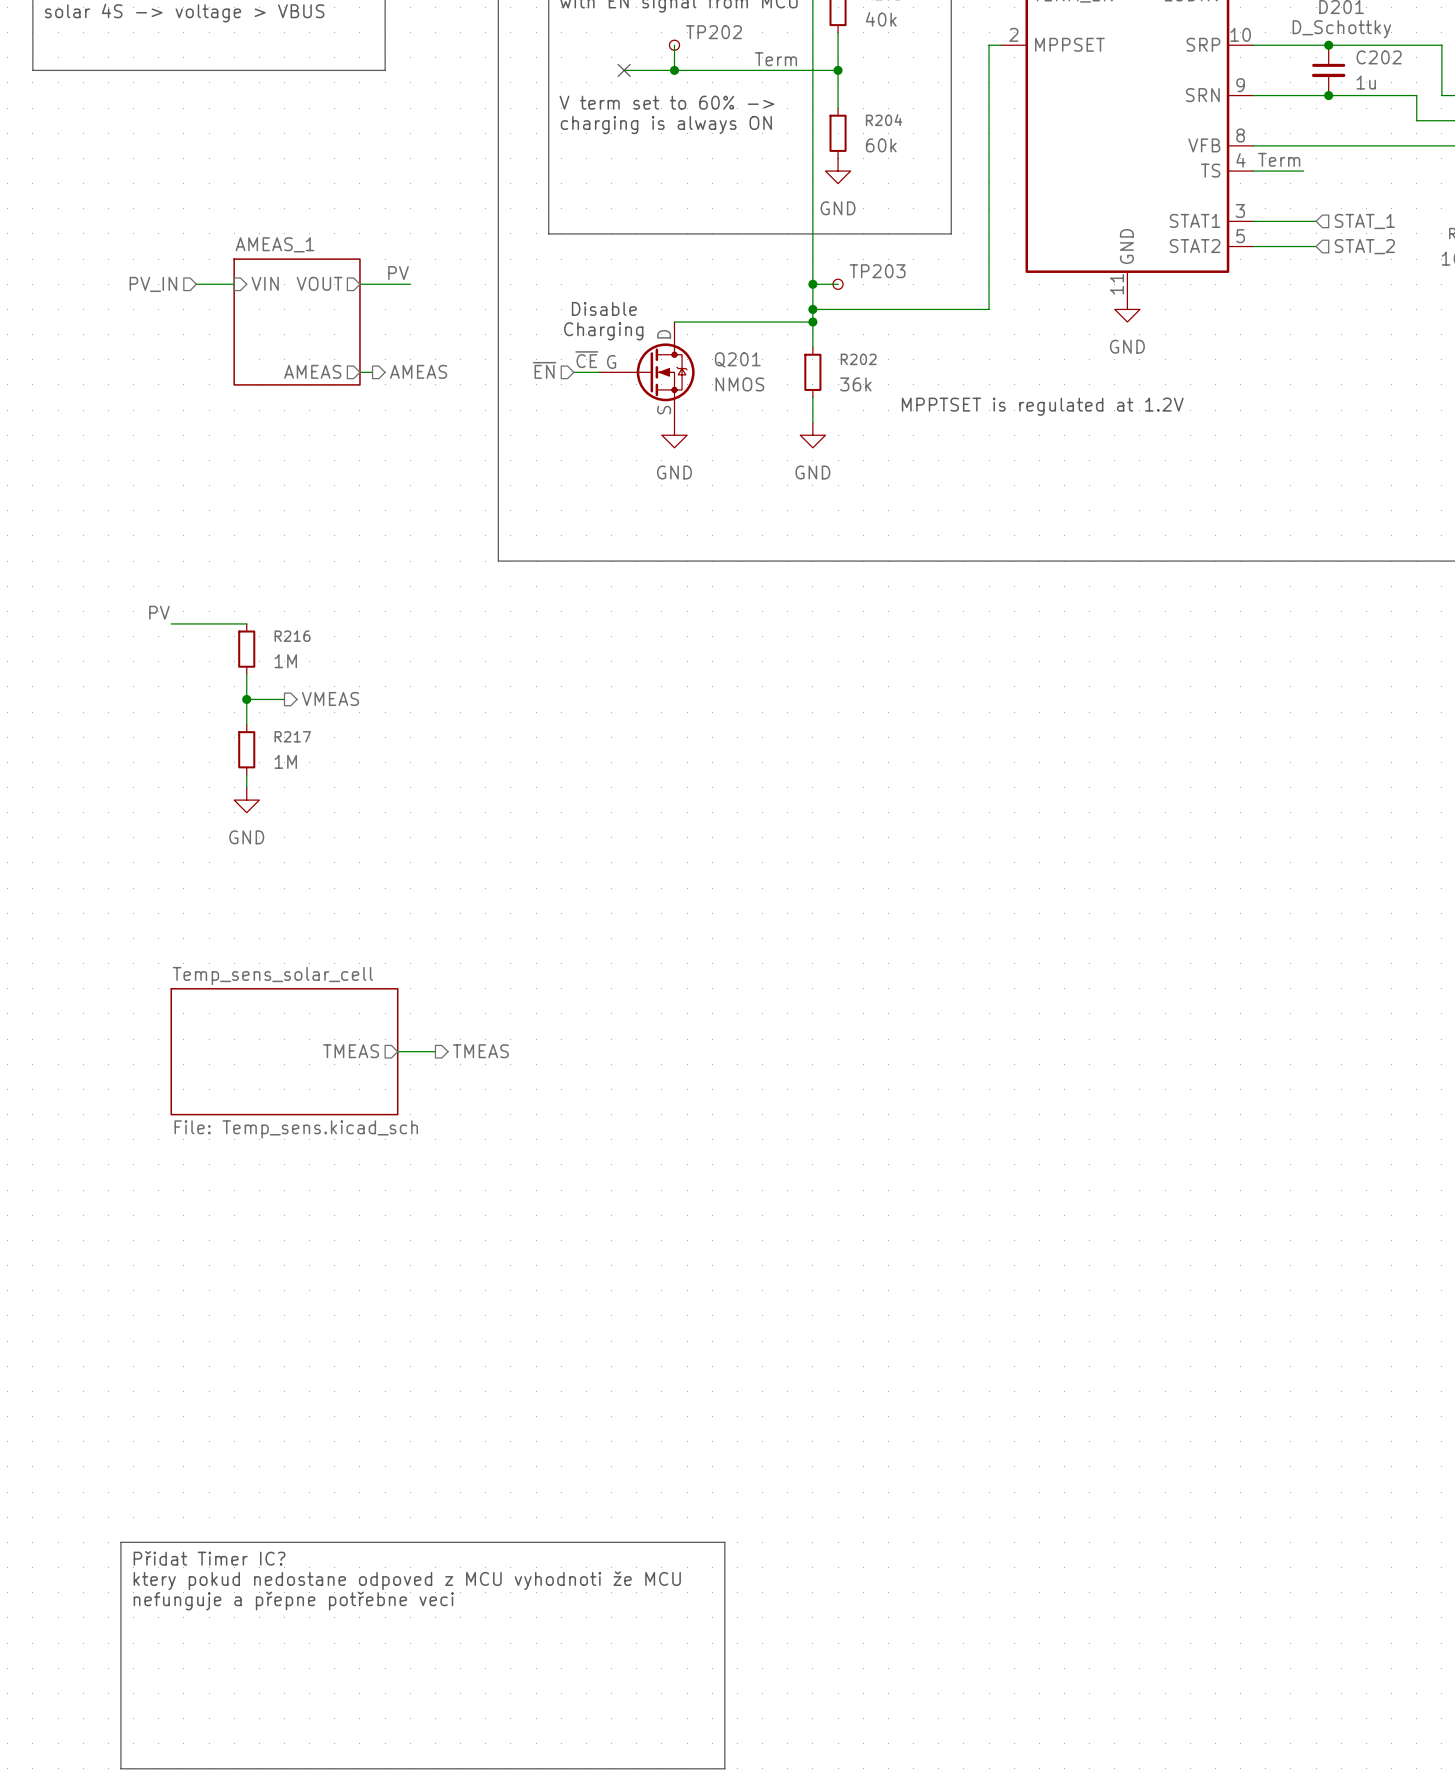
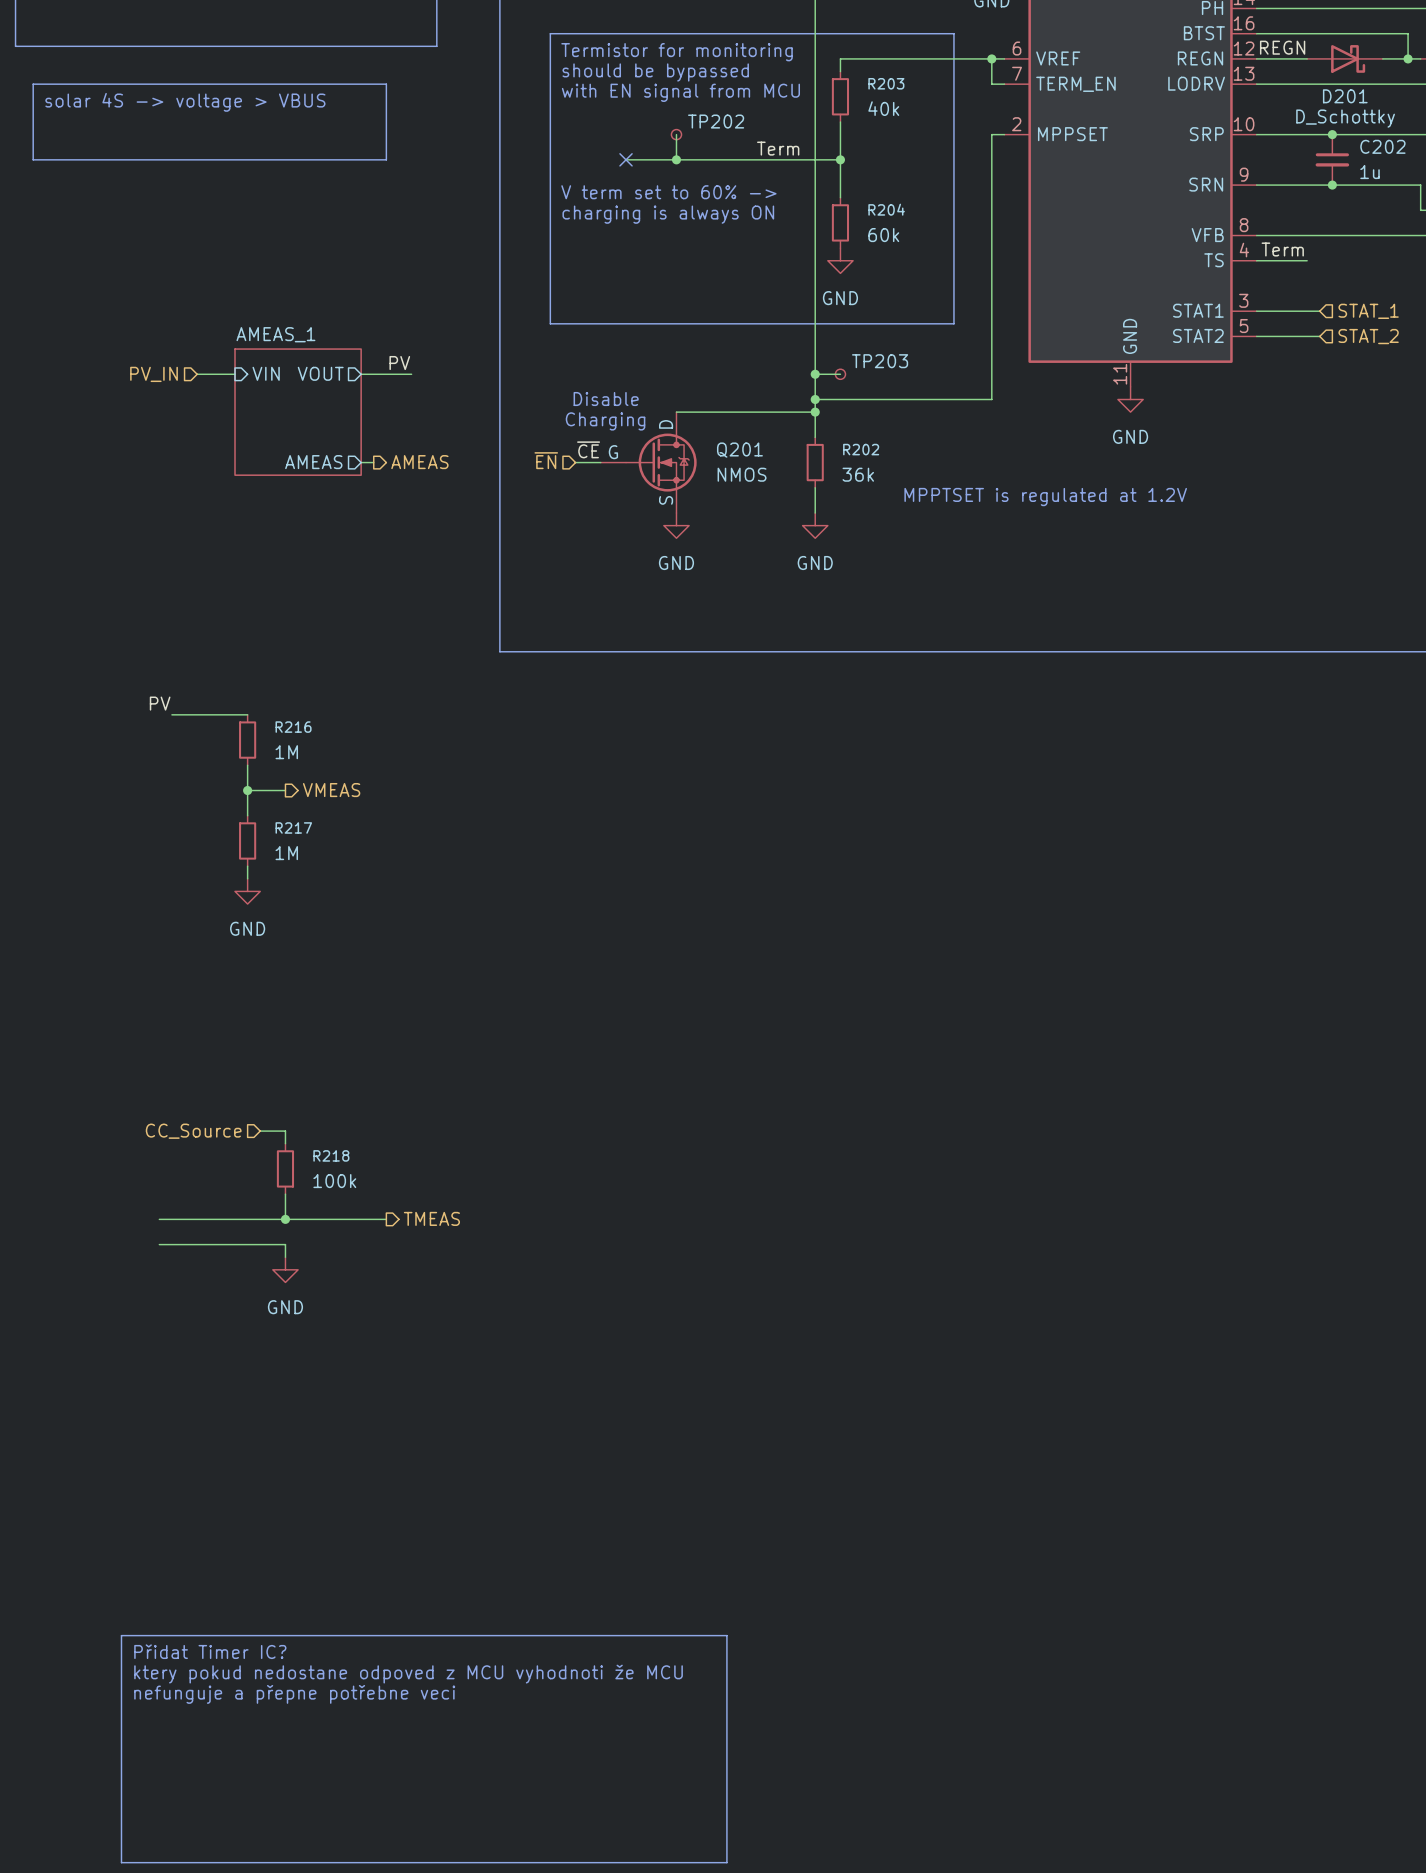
hierarchical label: none -> CC_Source (193, 1131)
wire: none -> (260, 1131) (285, 1131) (285, 1143)
sheet Temp_sens_solar_cell: File: Temp_sens.kicad_sch (284, 1051) -> none
sheet pin: TMEAS (351, 1051) -> none
wire: (397, 1051) (435, 1051) -> none
hierarchical label position: TMEAS (480, 1051) -> TMEAS (431, 1218)
R218: none -> 100k (285, 1168)
wire: none -> (285, 1194) (285, 1219)
wire: none -> (159, 1219) (386, 1219)
junction: none -> (285, 1219)
wire: none -> (159, 1244) (285, 1244) (285, 1257)
power symbol: none -> GND (285, 1269)

